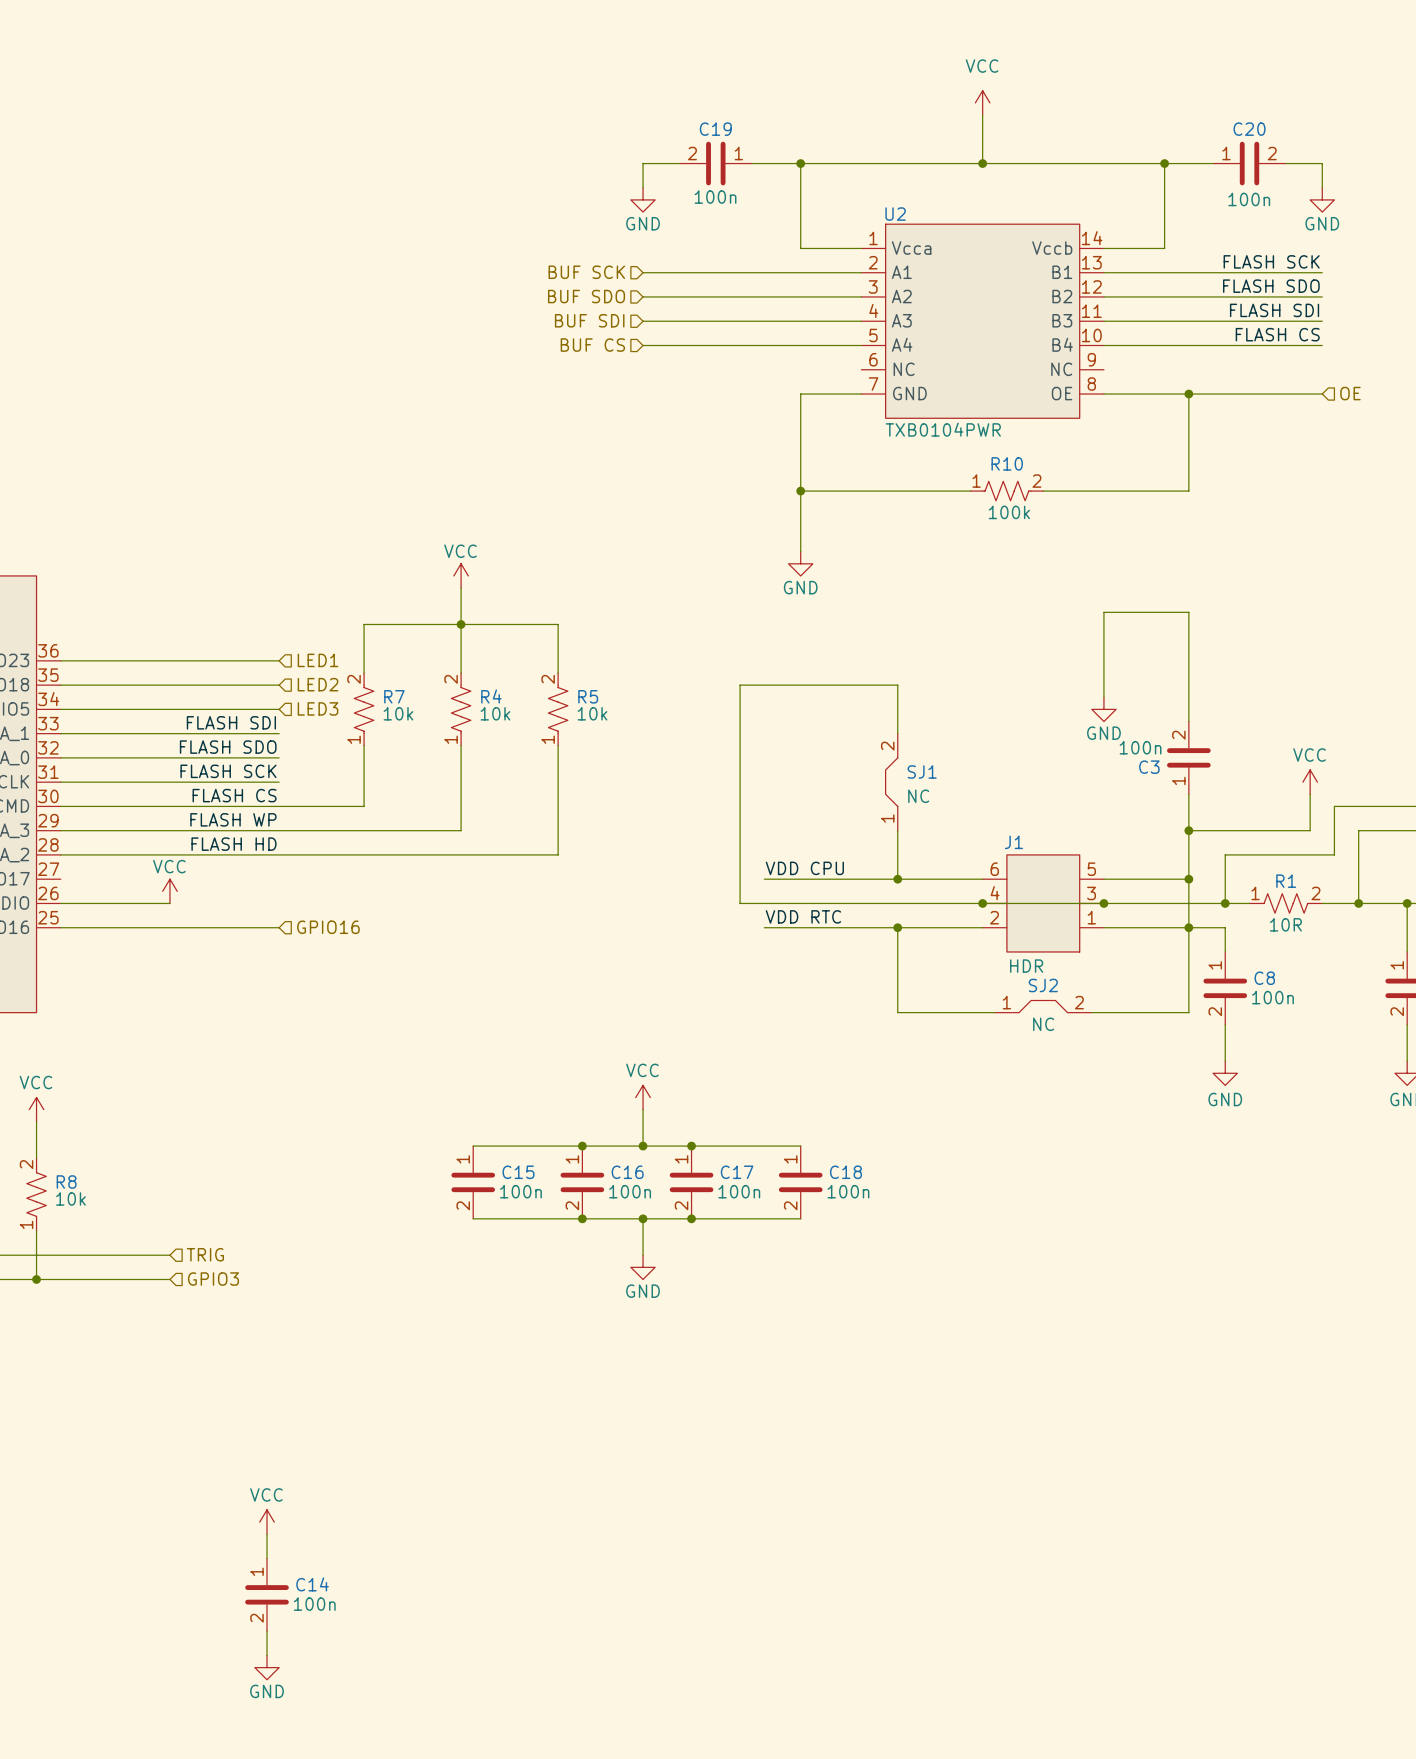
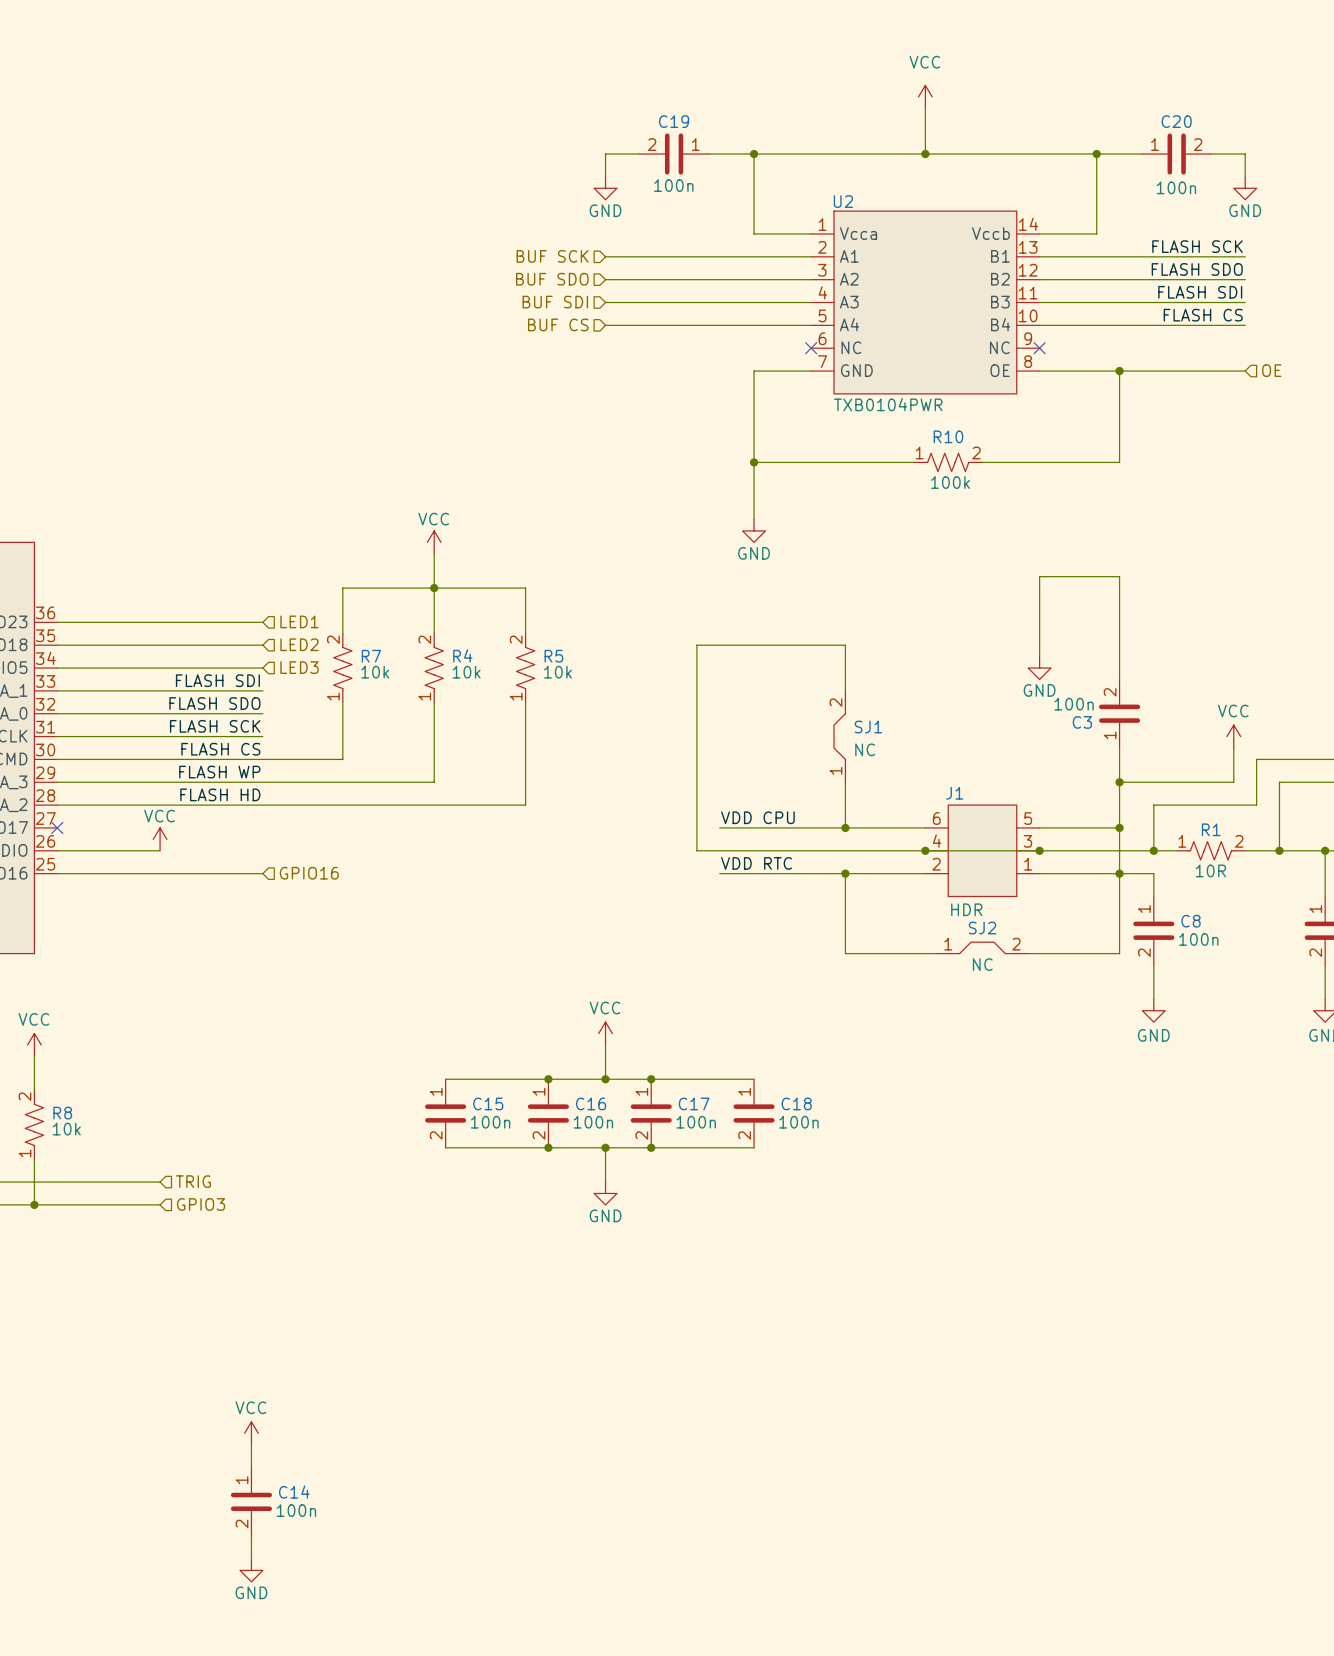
no-connect mark: none -> (811, 348)
no-connect mark: none -> (1039, 348)
no-connect mark: none -> (57, 827)

